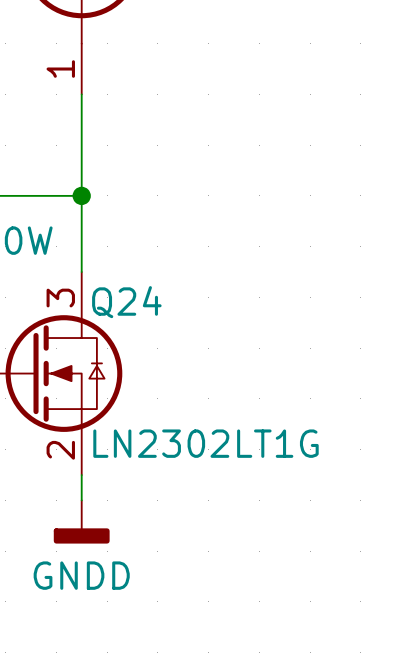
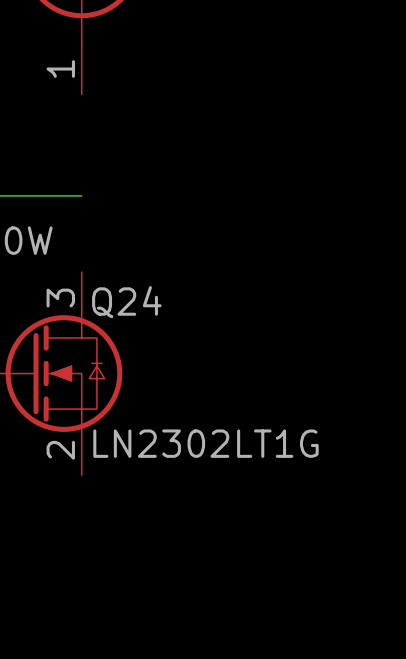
wire: (81, 94) (81, 272) -> none
junction: (81, 195) -> none
wire: (81, 475) (81, 500) -> none
power symbol: GNDD (81, 522) -> none

